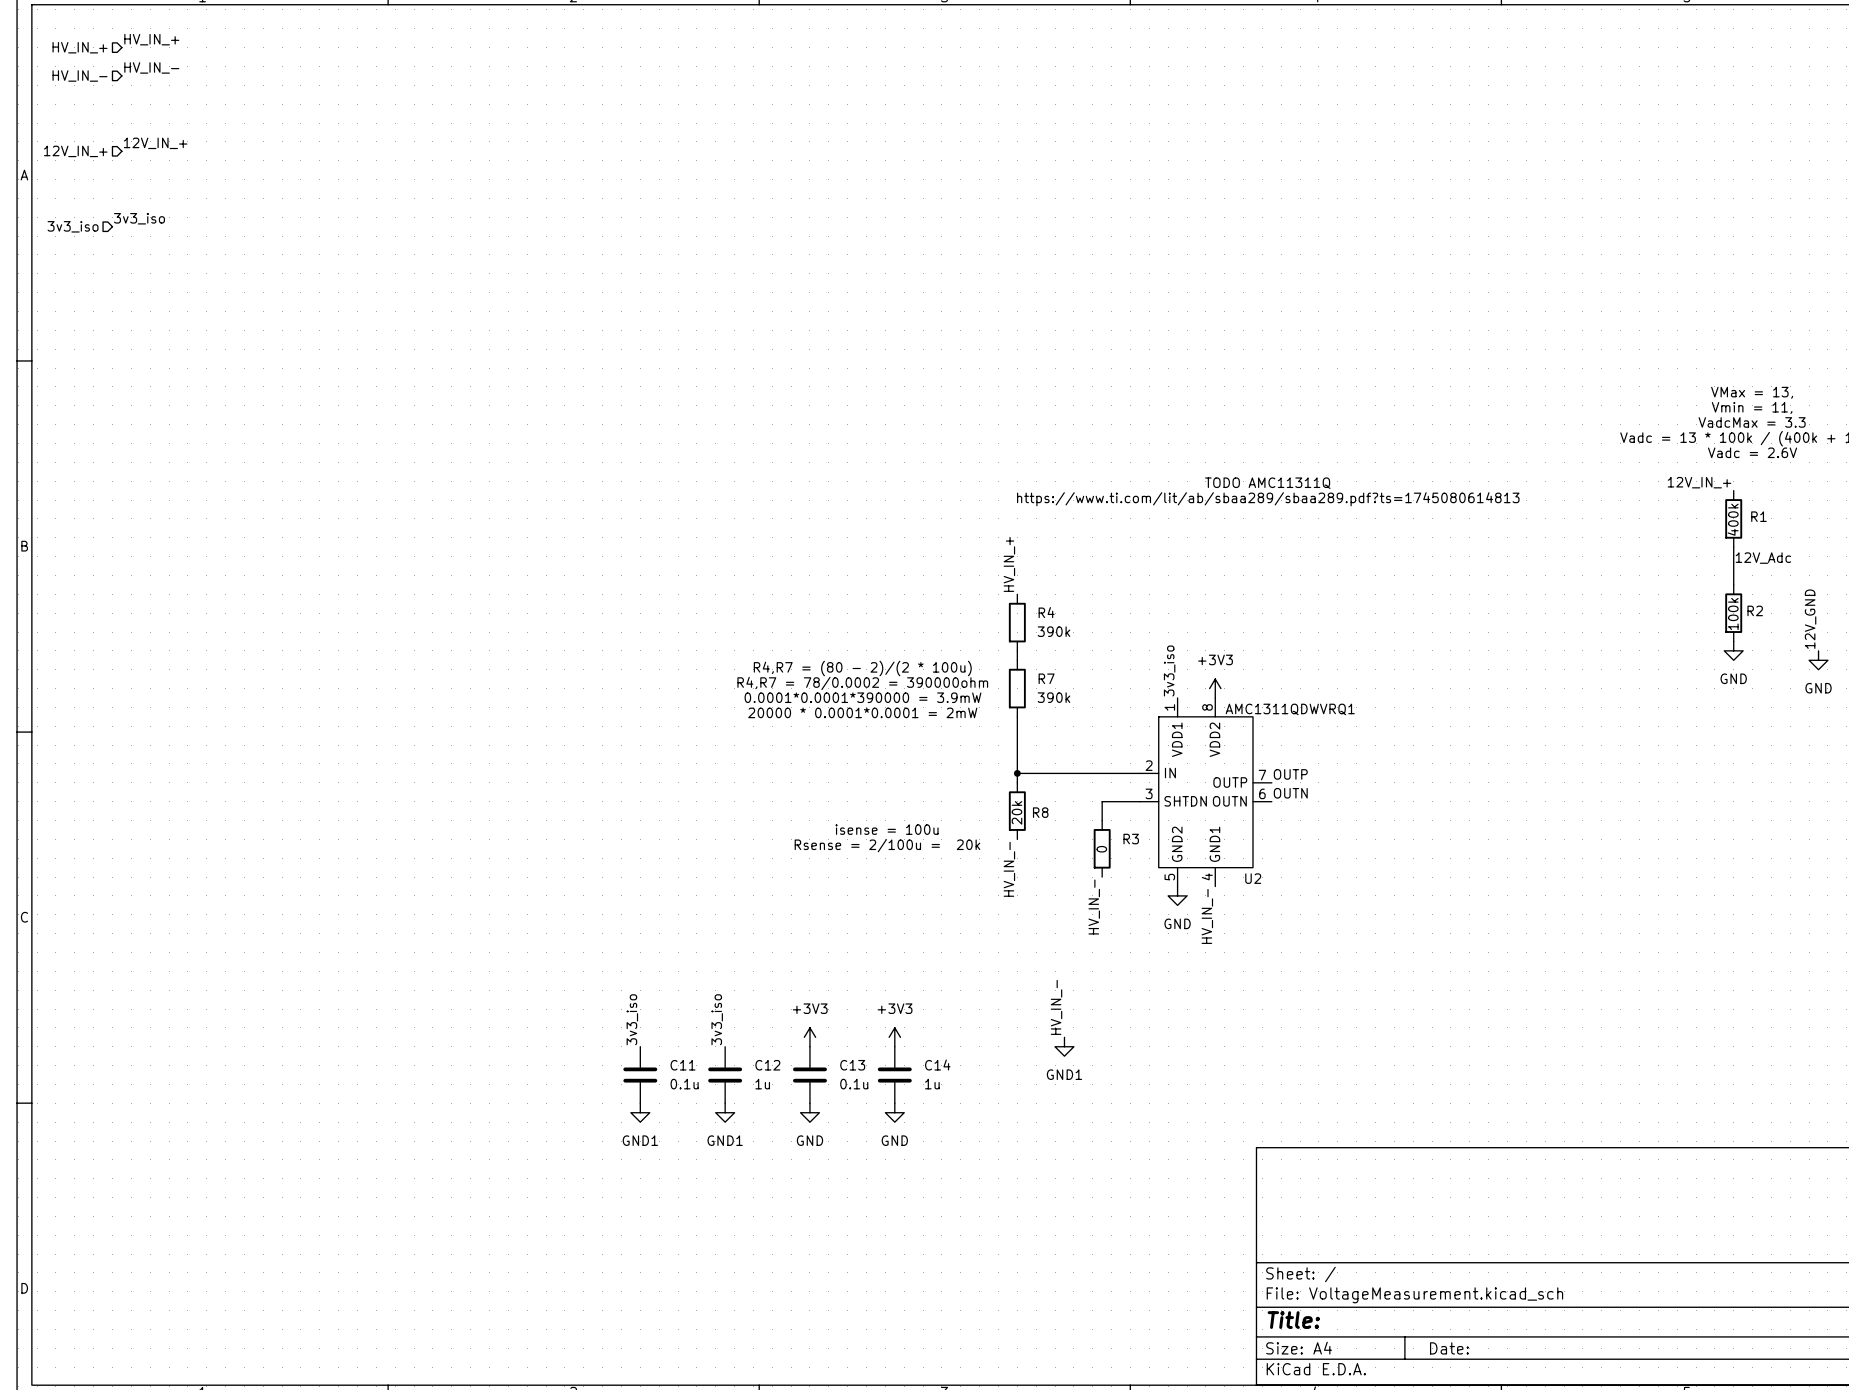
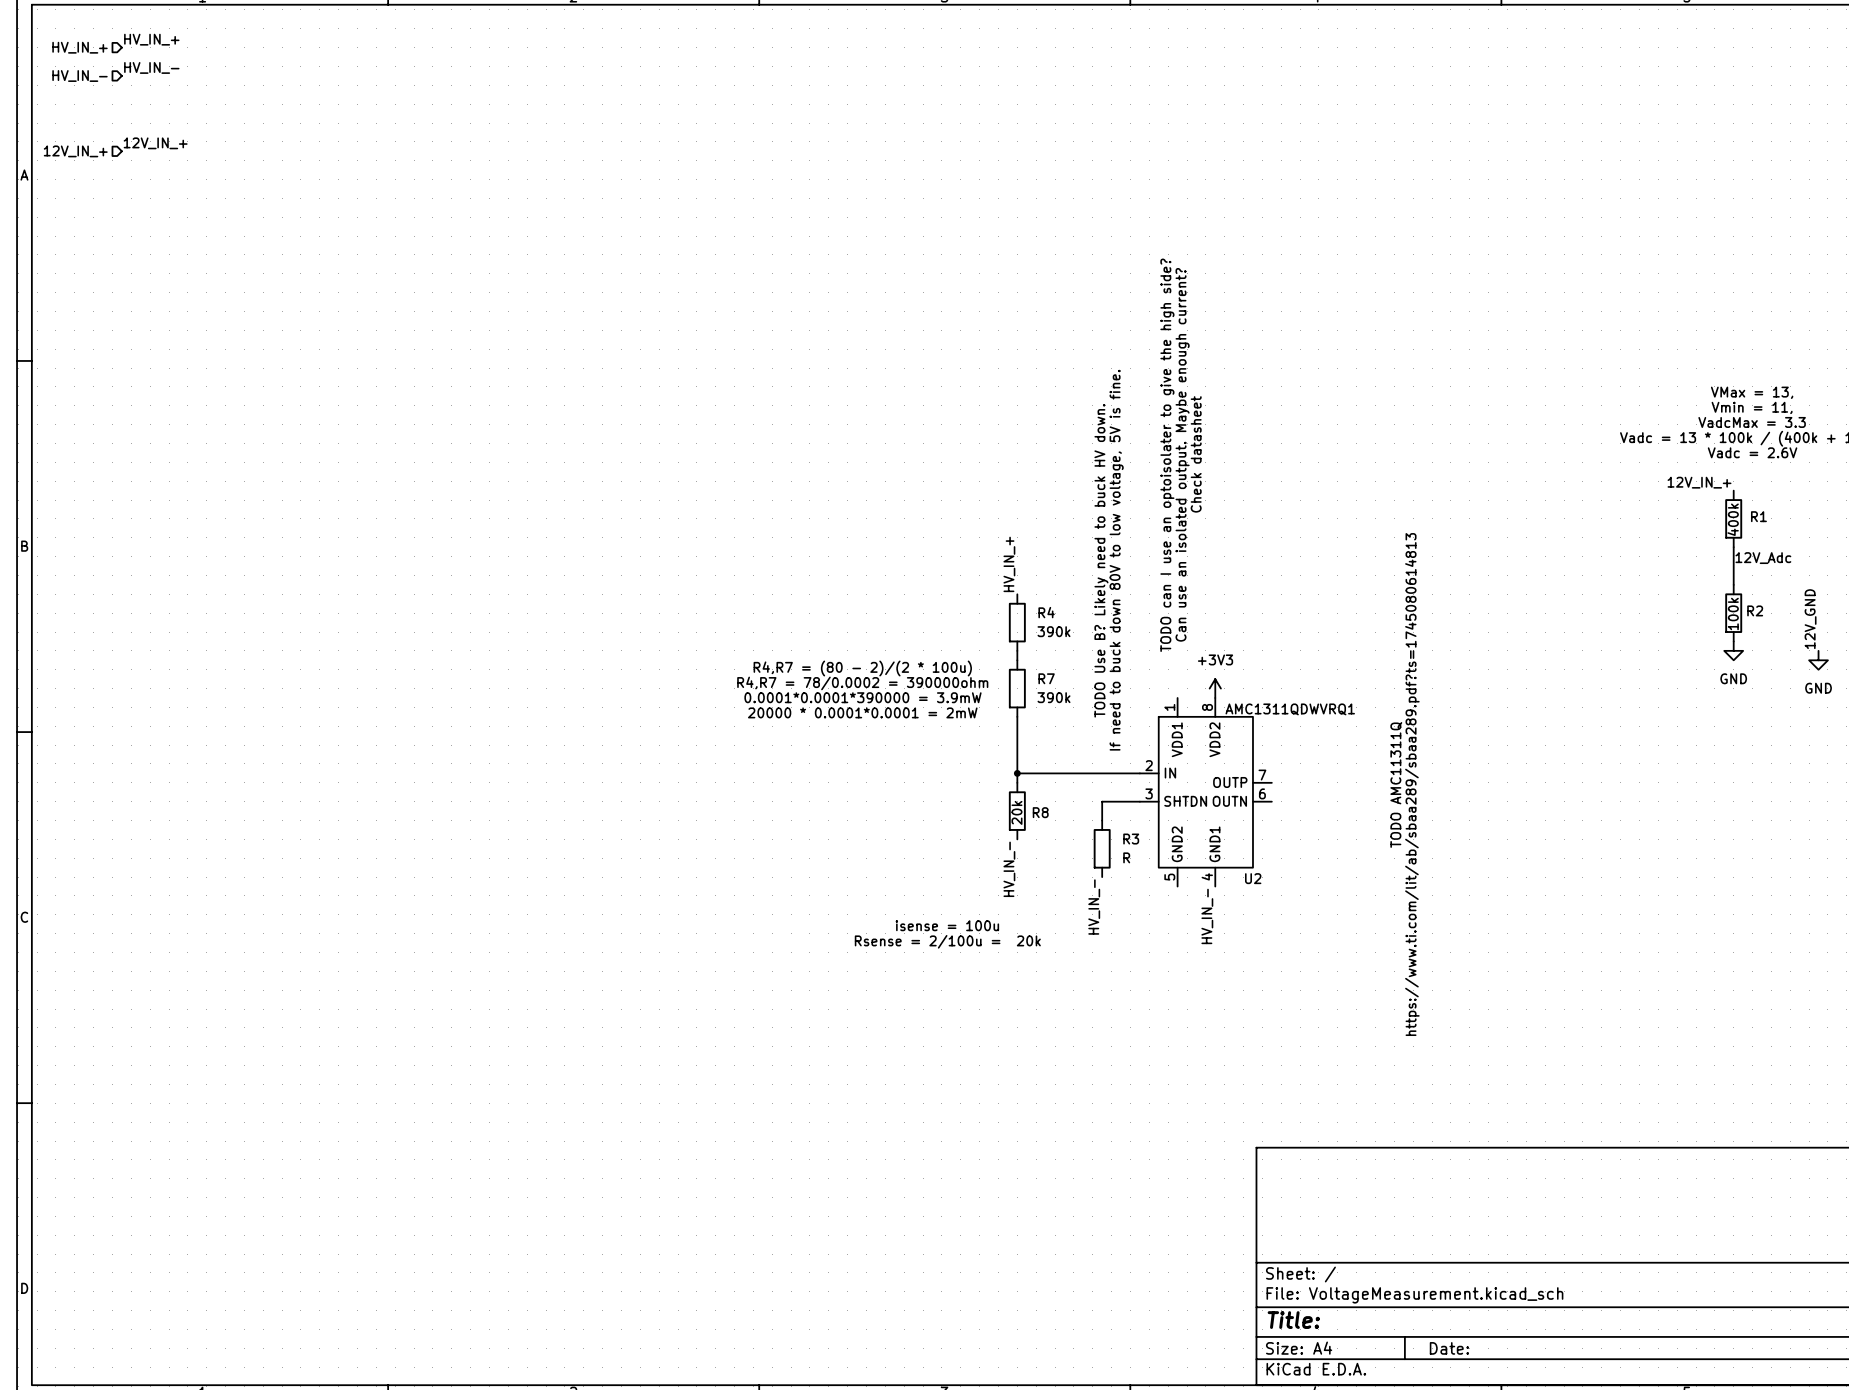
label: 3v3_iso (139, 218) -> none
hierarchical label: 3v3_iso (73, 226) -> none
text: none -> Can use an isolated output. Maybe enough current? (1182, 454)
text: none -> Check datasheet (1196, 454)
text: none -> TODO can I use an optoisolater to give the high side? (1167, 455)
text: TODO AMC11311Q (1267, 483) -> none
text: https://www.ti.com/lit/ab/sbaa289/sbaa289.pdf?ts=1745080614813 (1268, 499) -> none
text: none -> TODO Use B? Likely need to buck HV down. (1101, 560)
text: none -> If need to buck down 80V to low voltage, 5V is fine. (1116, 560)
label: 3v3_iso (1169, 671) -> none
label: OUTP (1290, 774) -> none
text: none -> TODO AMC11311Q (1396, 784)
text: none -> https://www.ti.com/lit/ab/sbaa289/sbaa289.pdf?ts=1745080614813 (1412, 784)
label: OUTN (1290, 793) -> none
text position: isense = 100u (887, 829) -> isense = 100u (947, 925)
text position: Rsense = 2/100u = 20k (887, 845) -> Rsense = 2/100u = 20k (947, 941)
R3 value: 0 (1101, 849) -> R (1126, 857)
power symbol: GND (1177, 895) -> none
label: HV_IN_- (1056, 1007) -> none
label: 3v3_iso (632, 1019) -> none
label: 3v3_iso (717, 1019) -> none
power symbol: +3V3 (809, 1037) -> none
power symbol: +3V3 (894, 1037) -> none
power symbol: GND1 (1064, 1046) -> none
C11: 0.1u (640, 1075) -> none
C12: 1u (725, 1075) -> none
C13: 0.1u (809, 1075) -> none
C14: 1u (894, 1075) -> none
power symbol: GND1 (640, 1112) -> none
power symbol: GND1 (725, 1112) -> none
power symbol: GND (809, 1112) -> none
power symbol: GND (894, 1112) -> none

